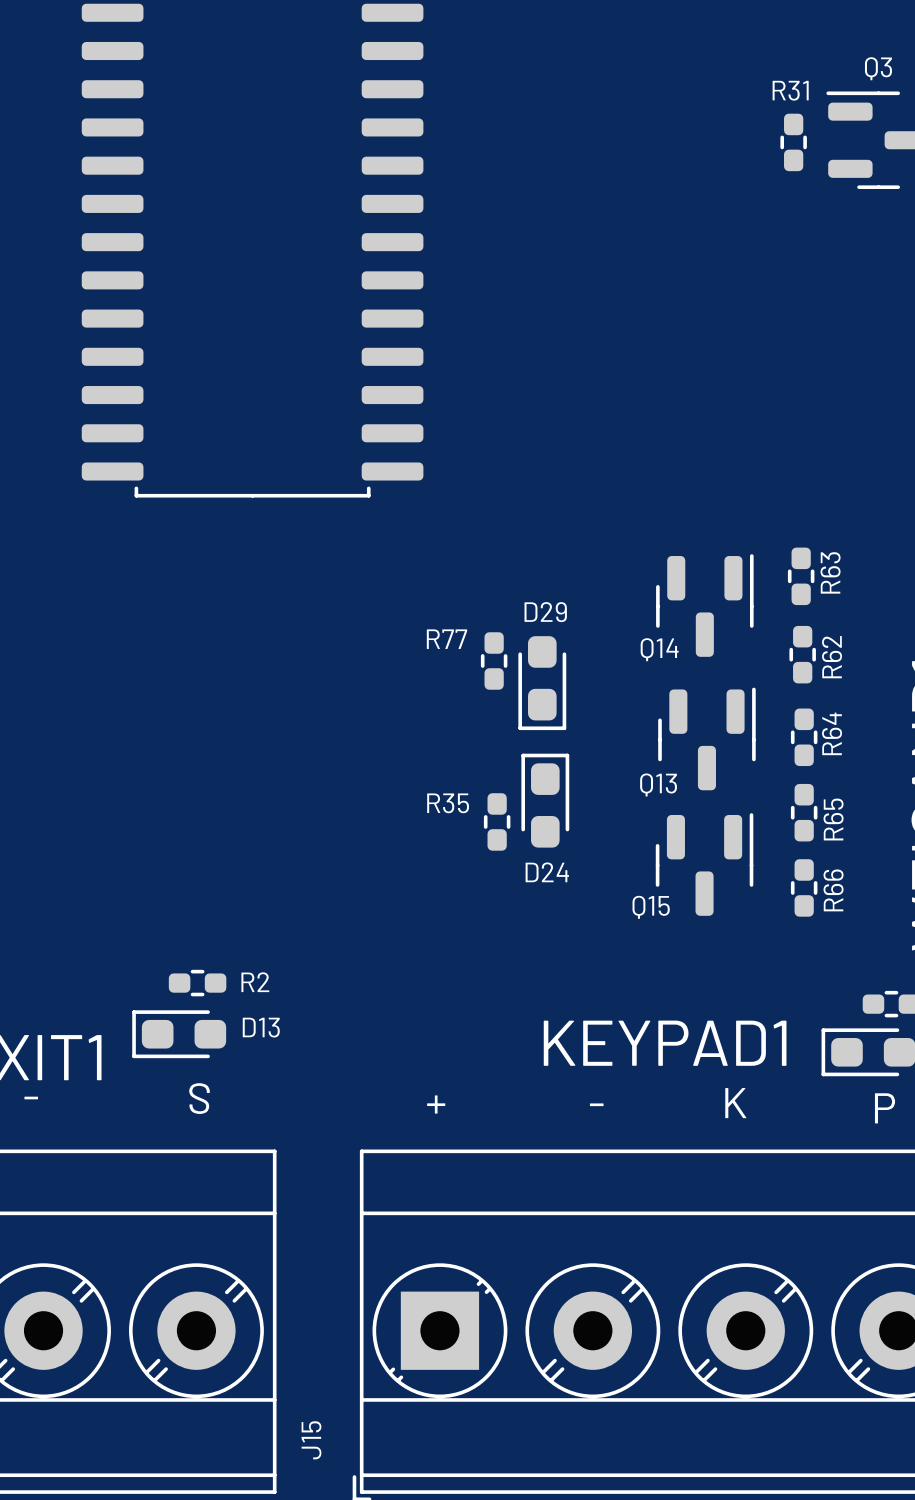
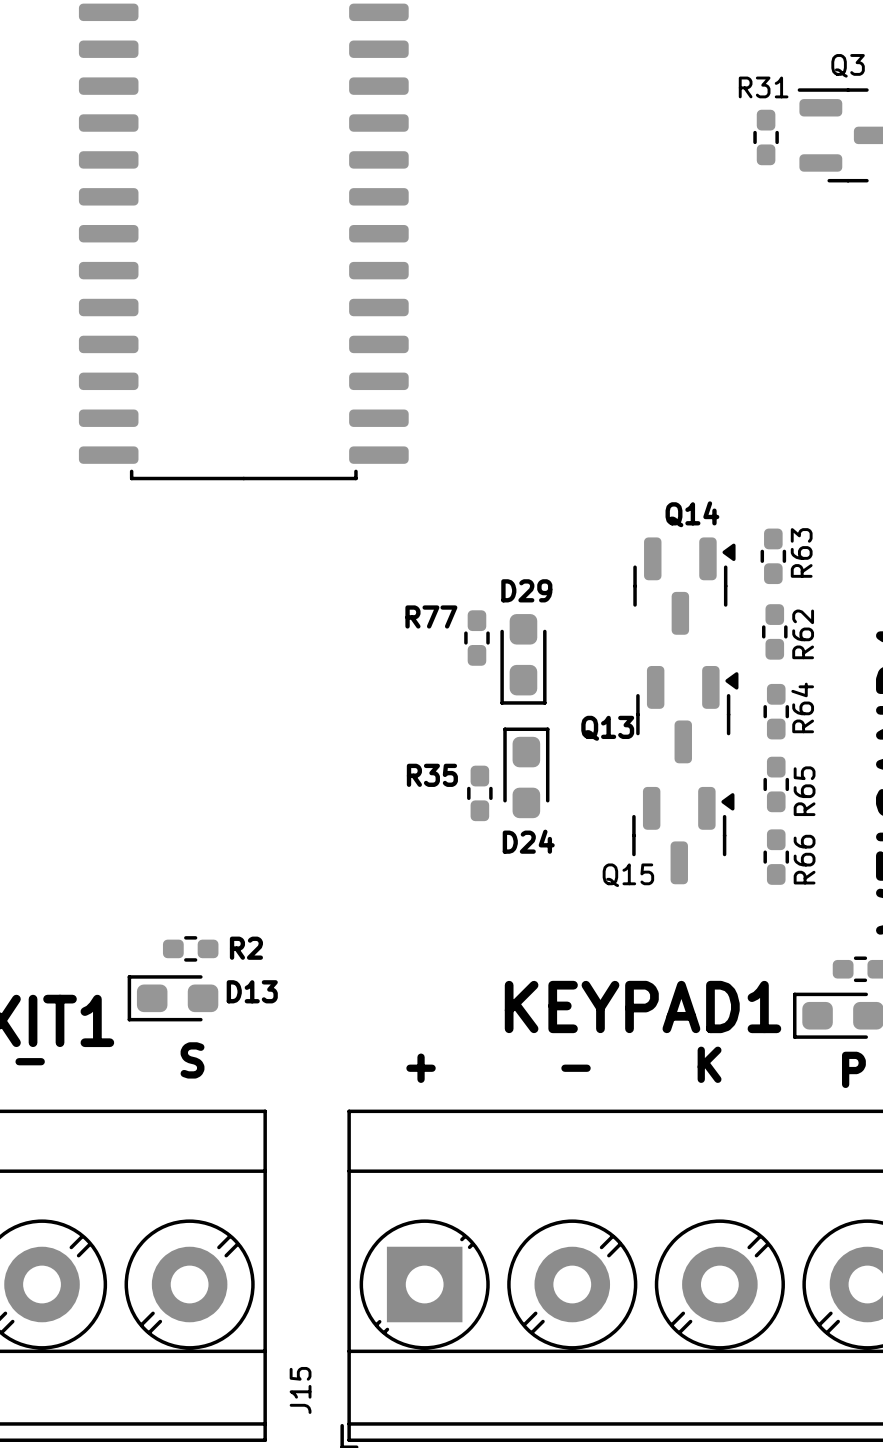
Q14 footprint: [656, 554, 754, 657] -> [633, 537, 736, 635]
Q14 name position: Q14 (659, 649) -> Q14 (692, 514)
Q13 footprint: [658, 687, 756, 791] -> [636, 665, 739, 764]
Q13 name position: Q13 (658, 784) -> Q13 (607, 728)
Q15 footprint: [655, 813, 754, 916] -> [632, 786, 735, 885]

